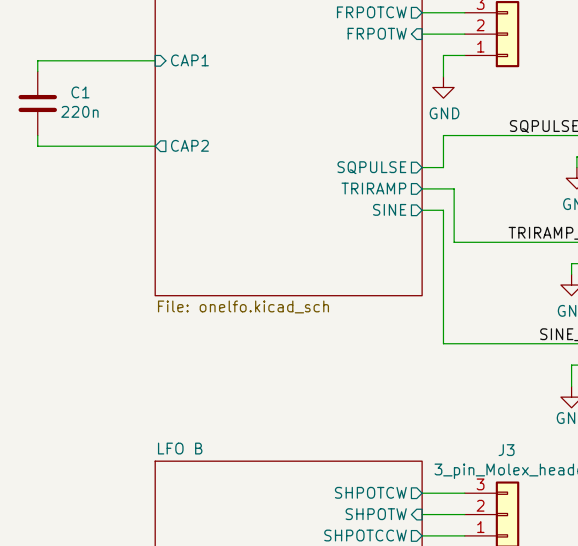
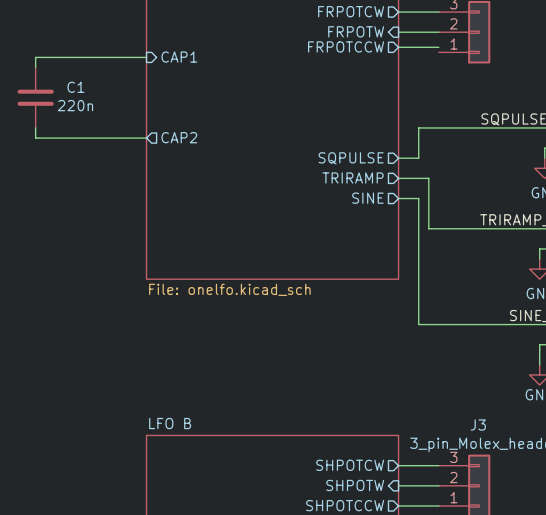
sheet pin: none -> FRPOTCCW (346, 46)
wire: none -> (398, 47) (438, 47)
wire: (464, 55) (443, 55) (443, 76) -> none
power symbol: GND (443, 87) -> none

